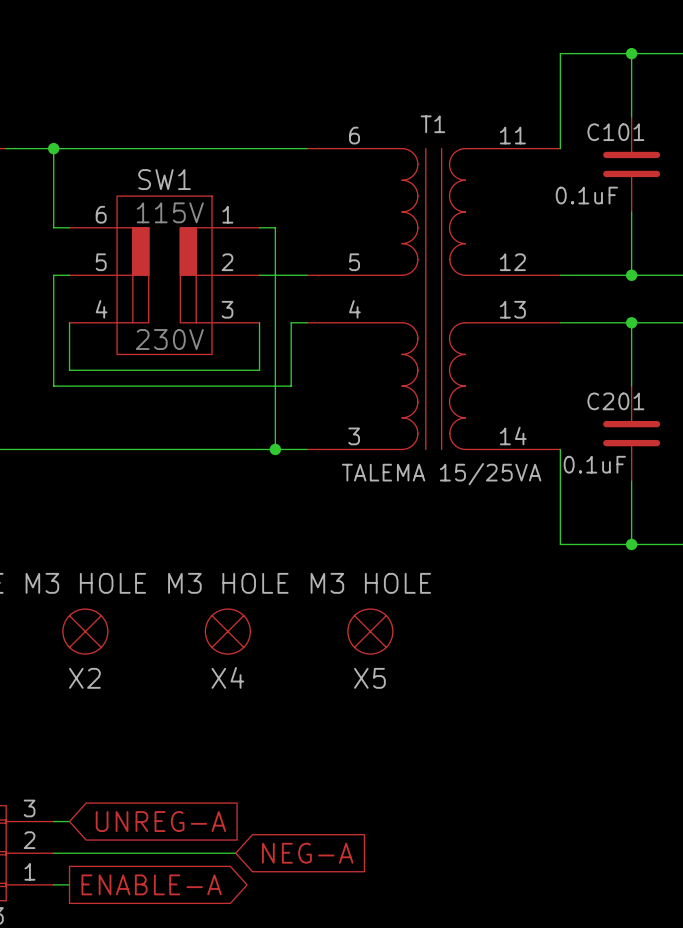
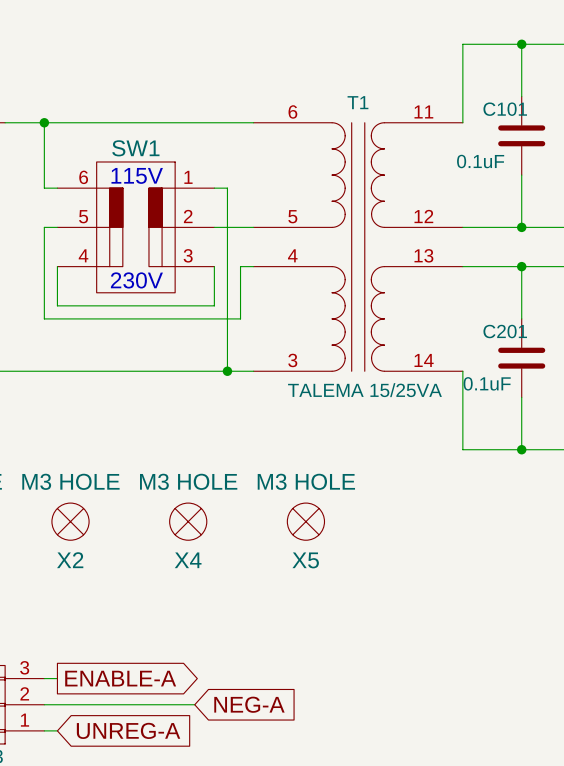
global label shape: input (160, 821) -> output (120, 678)
global label: UNREG-A (160, 821) -> ENABLE-A (120, 678)
global label shape: output (151, 884) -> input (128, 730)
global label: ENABLE-A (151, 884) -> UNREG-A (128, 730)

